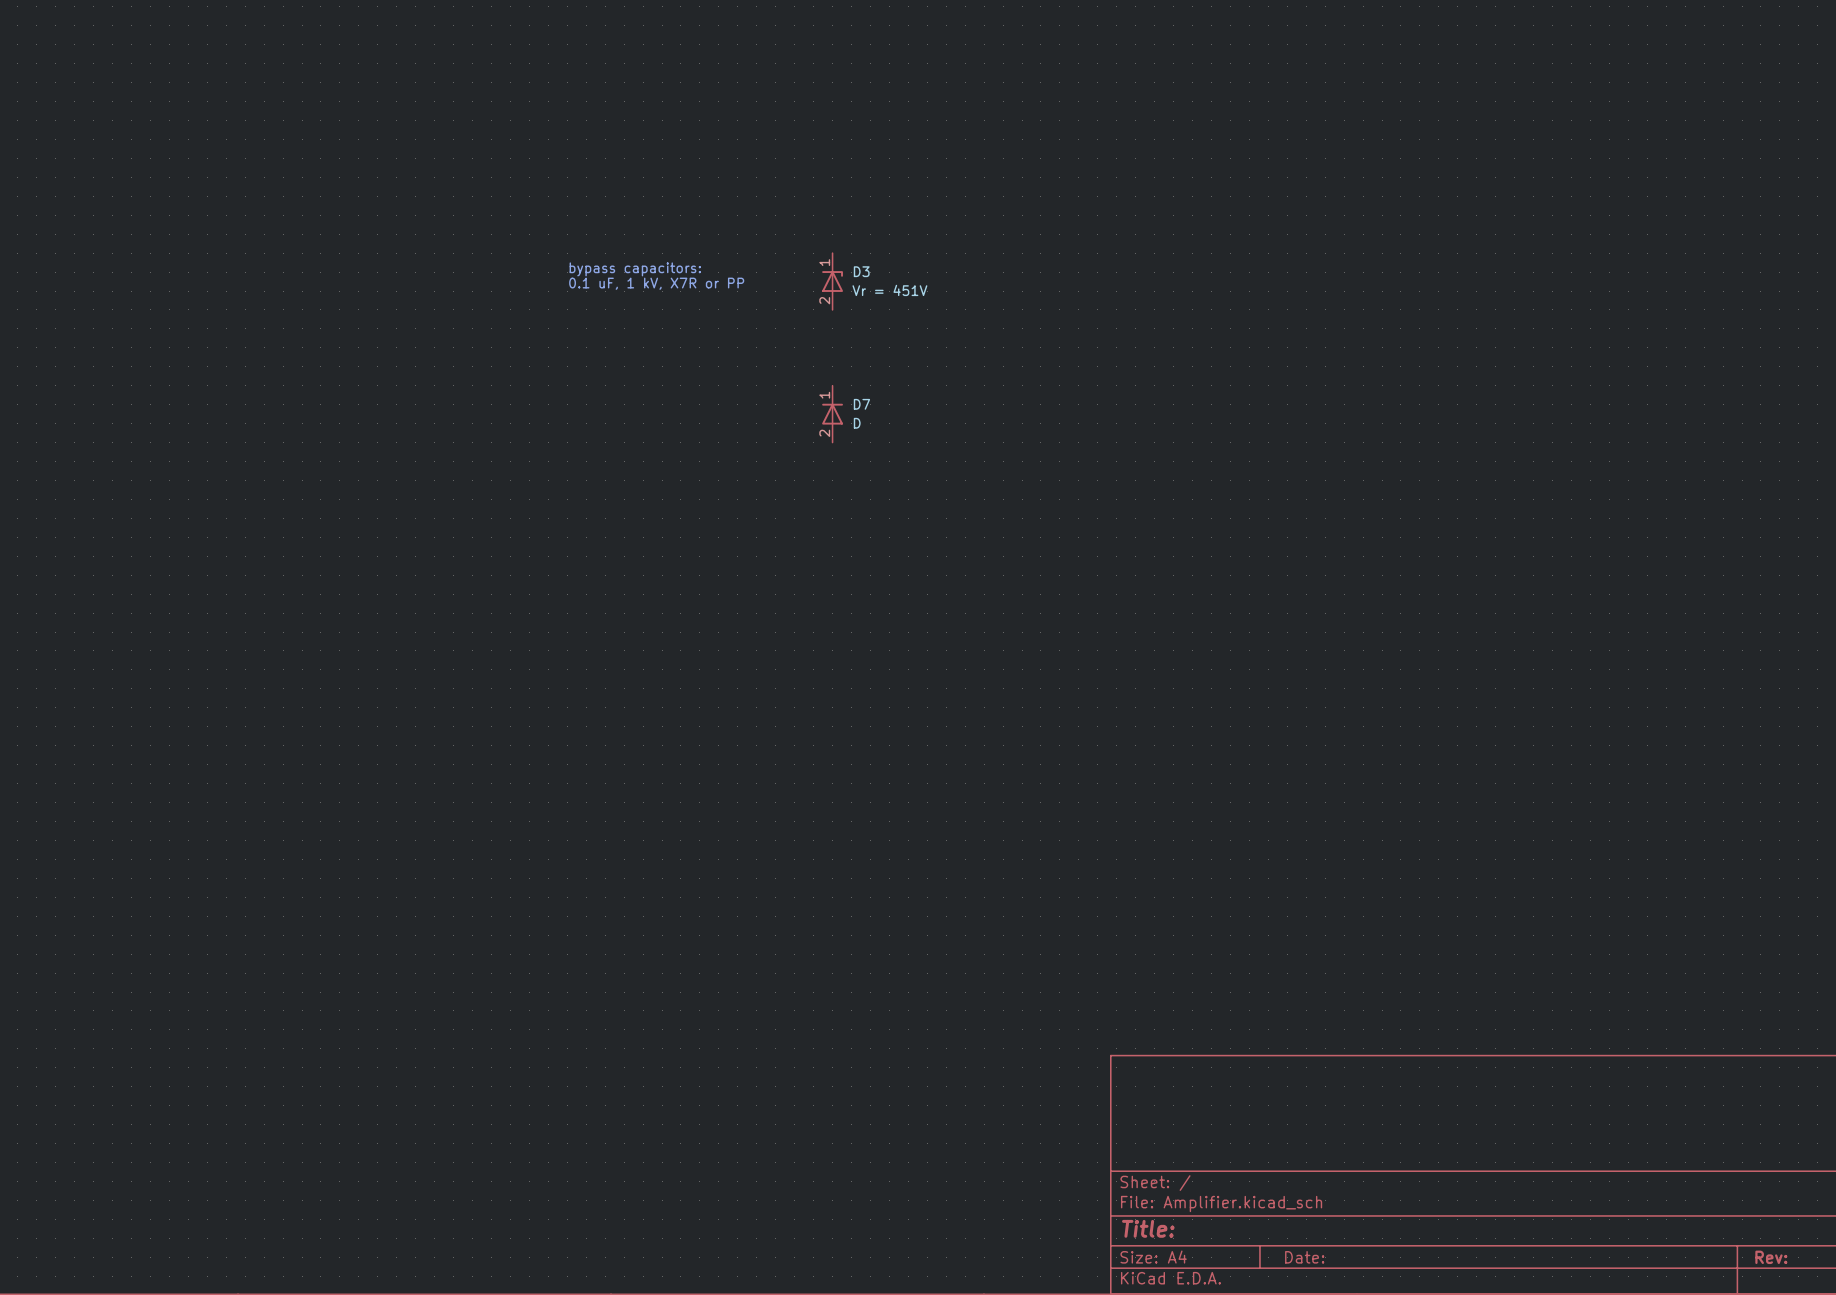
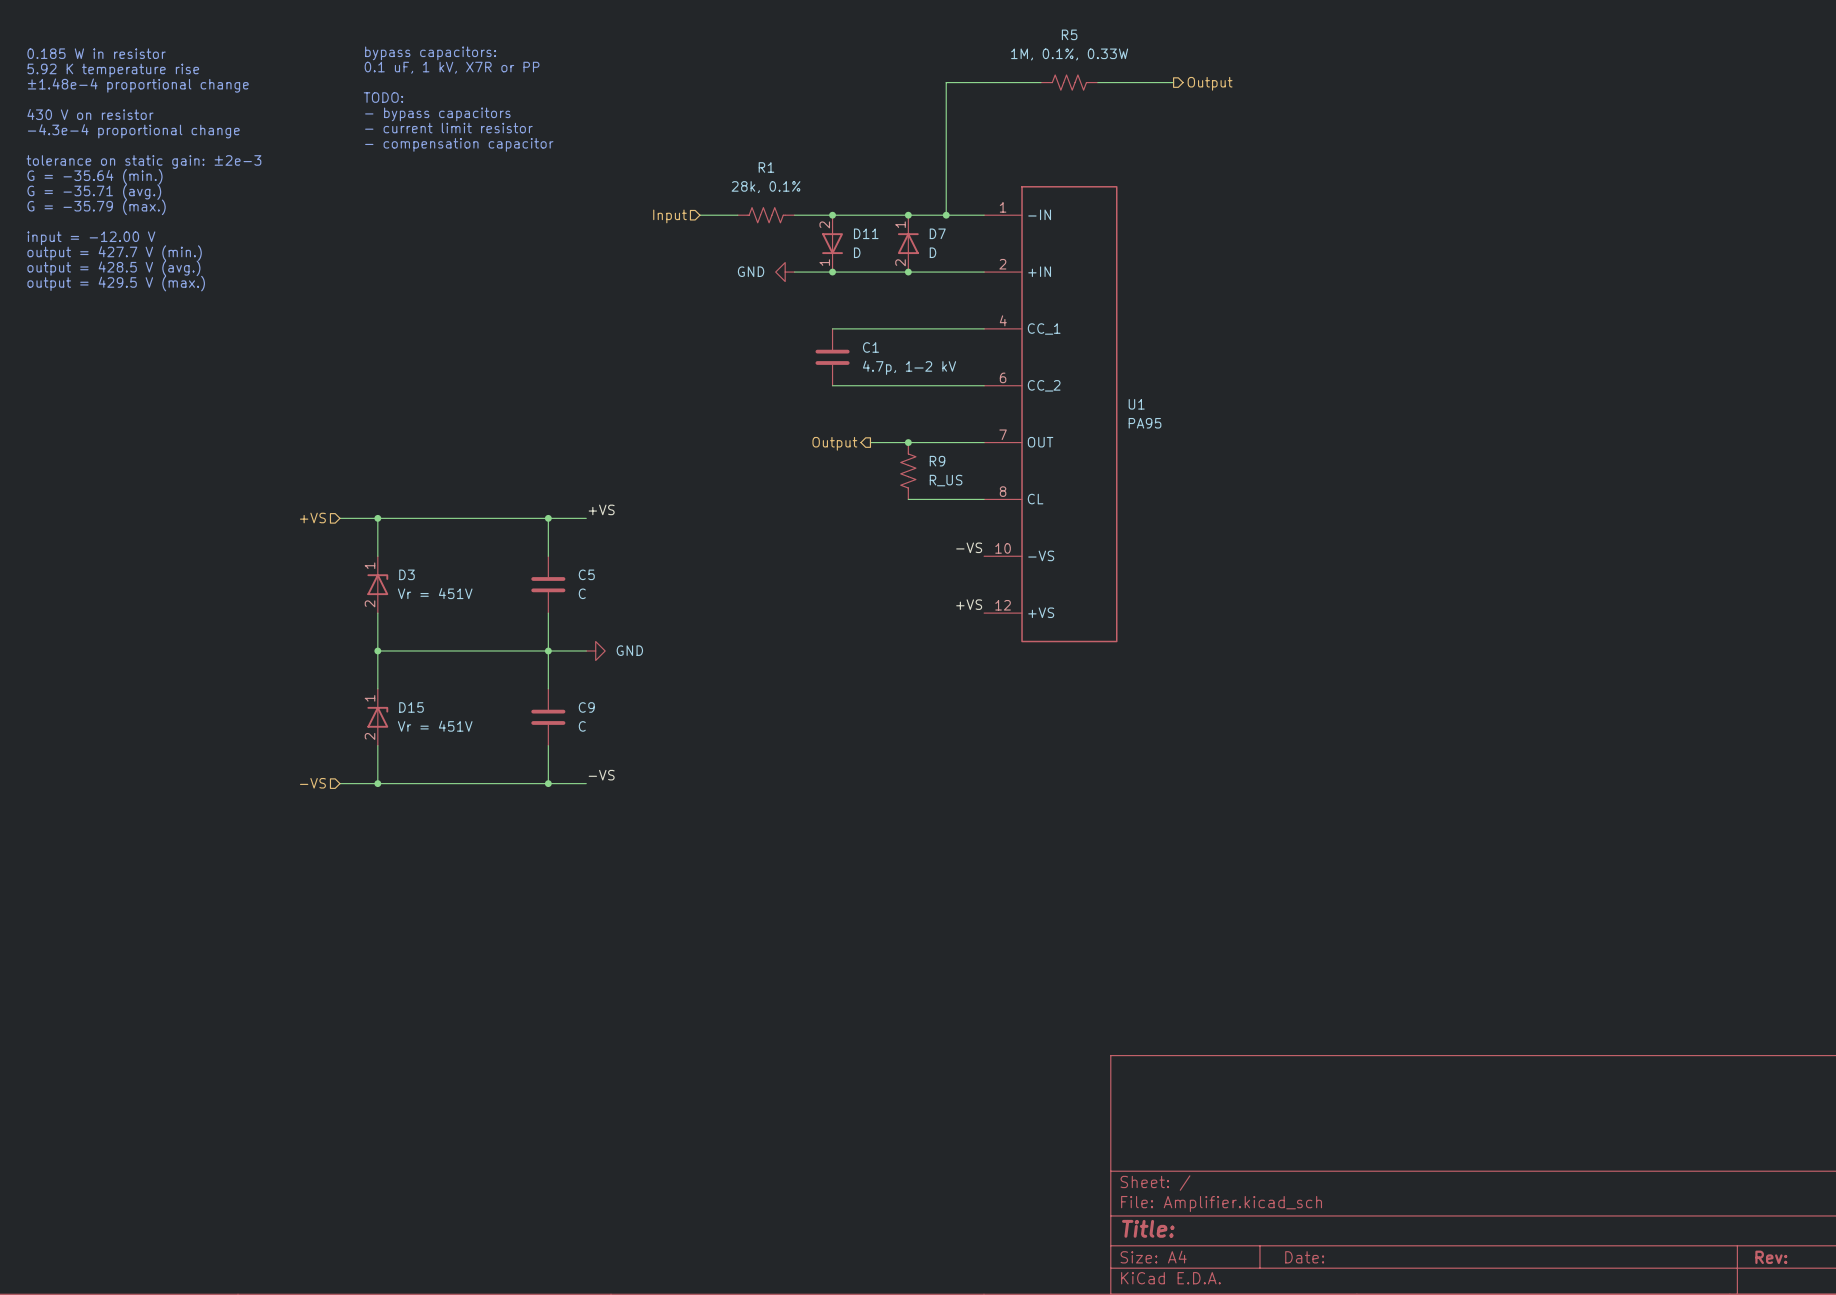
text: none -> 0.185 W in resistor (96, 53)
text: none -> bypass capacitors: (430, 53)
text: none -> 0.1 uF, 1 kV, X7R or PP (452, 67)
text: none -> 5.92 K temperature rise (113, 70)
wire: none -> (1040, 82) (946, 82) (946, 215)
R5: none -> 1M, 0.1%, 0.33W (1069, 82)
wire: none -> (1097, 82) (1173, 82)
hierarchical label: none -> Output (1210, 83)
text: none -> ±1.48e-4 proportional change (138, 85)
text: none -> TODO: (383, 97)
text: none -> 430 V on resistor (90, 114)
text: none -> - bypass capacitors (437, 114)
text: none -> - current limit resistor (448, 128)
text: none -> -4.3e-4 proportional change (133, 131)
text: none -> - compensation capacitor (459, 144)
text: none -> tolerance on static gain: ±2e-3 (143, 162)
text: none -> G = -35.64 (min.) (94, 176)
text: none -> G = -35.71 (avg.) (94, 192)
text: none -> G = -35.79 (max.) (96, 207)
wire: none -> (699, 215) (737, 215)
R1: none -> 28k, 0.1% (766, 215)
wire: none -> (794, 215) (984, 215)
junction: none -> (832, 215)
junction: none -> (908, 215)
junction: none -> (946, 215)
hierarchical label: none -> Input (670, 216)
text: none -> input = -12.00 V (91, 238)
D11: none -> D (832, 243)
text: none -> output = 427.7 V (min.) (114, 253)
text: none -> output = 428.5 V (avg.) (113, 268)
text: bypass capacitors: (635, 269) -> none
power symbol: none -> GND (785, 272)
wire: none -> (794, 272) (984, 272)
junction: none -> (832, 272)
junction: none -> (908, 272)
D3 position: (832, 281) -> (377, 584)
text: none -> output = 429.5 V (max.) (116, 283)
text: 0.1 uF, 1 kV, X7R or PP (656, 283) -> none
wire: none -> (832, 328) (984, 328)
C1: none -> 4.7p, 1—2 kV (832, 357)
wire: none -> (832, 385) (984, 385)
D7 position: (832, 414) -> (908, 243)
U1: none -> PA95 (1050, 414)
wire: none -> (870, 442) (984, 442)
junction: none -> (908, 442)
hierarchical label: none -> Output (834, 443)
R9: none -> R_US (908, 470)
wire: none -> (908, 499) (984, 499)
label: none -> +VS (601, 509)
hierarchical label: none -> +VS (312, 518)
wire: none -> (339, 518) (586, 518)
wire: none -> (377, 518) (377, 556)
junction: none -> (377, 518)
wire: none -> (548, 518) (548, 556)
junction: none -> (548, 518)
label: none -> -VS (969, 547)
C5: none -> C (548, 584)
label: none -> +VS (969, 604)
wire: none -> (377, 613) (377, 688)
wire: none -> (548, 613) (548, 688)
wire: none -> (377, 650) (586, 650)
junction: none -> (377, 650)
junction: none -> (548, 650)
power symbol: none -> GND (595, 650)
D15: none -> Vr = 451V (377, 717)
C9: none -> C (548, 717)
wire: none -> (377, 745) (377, 783)
wire: none -> (548, 745) (548, 783)
label: none -> -VS (601, 775)
hierarchical label: none -> -VS (312, 783)
wire: none -> (339, 783) (586, 783)
junction: none -> (377, 783)
junction: none -> (548, 783)

